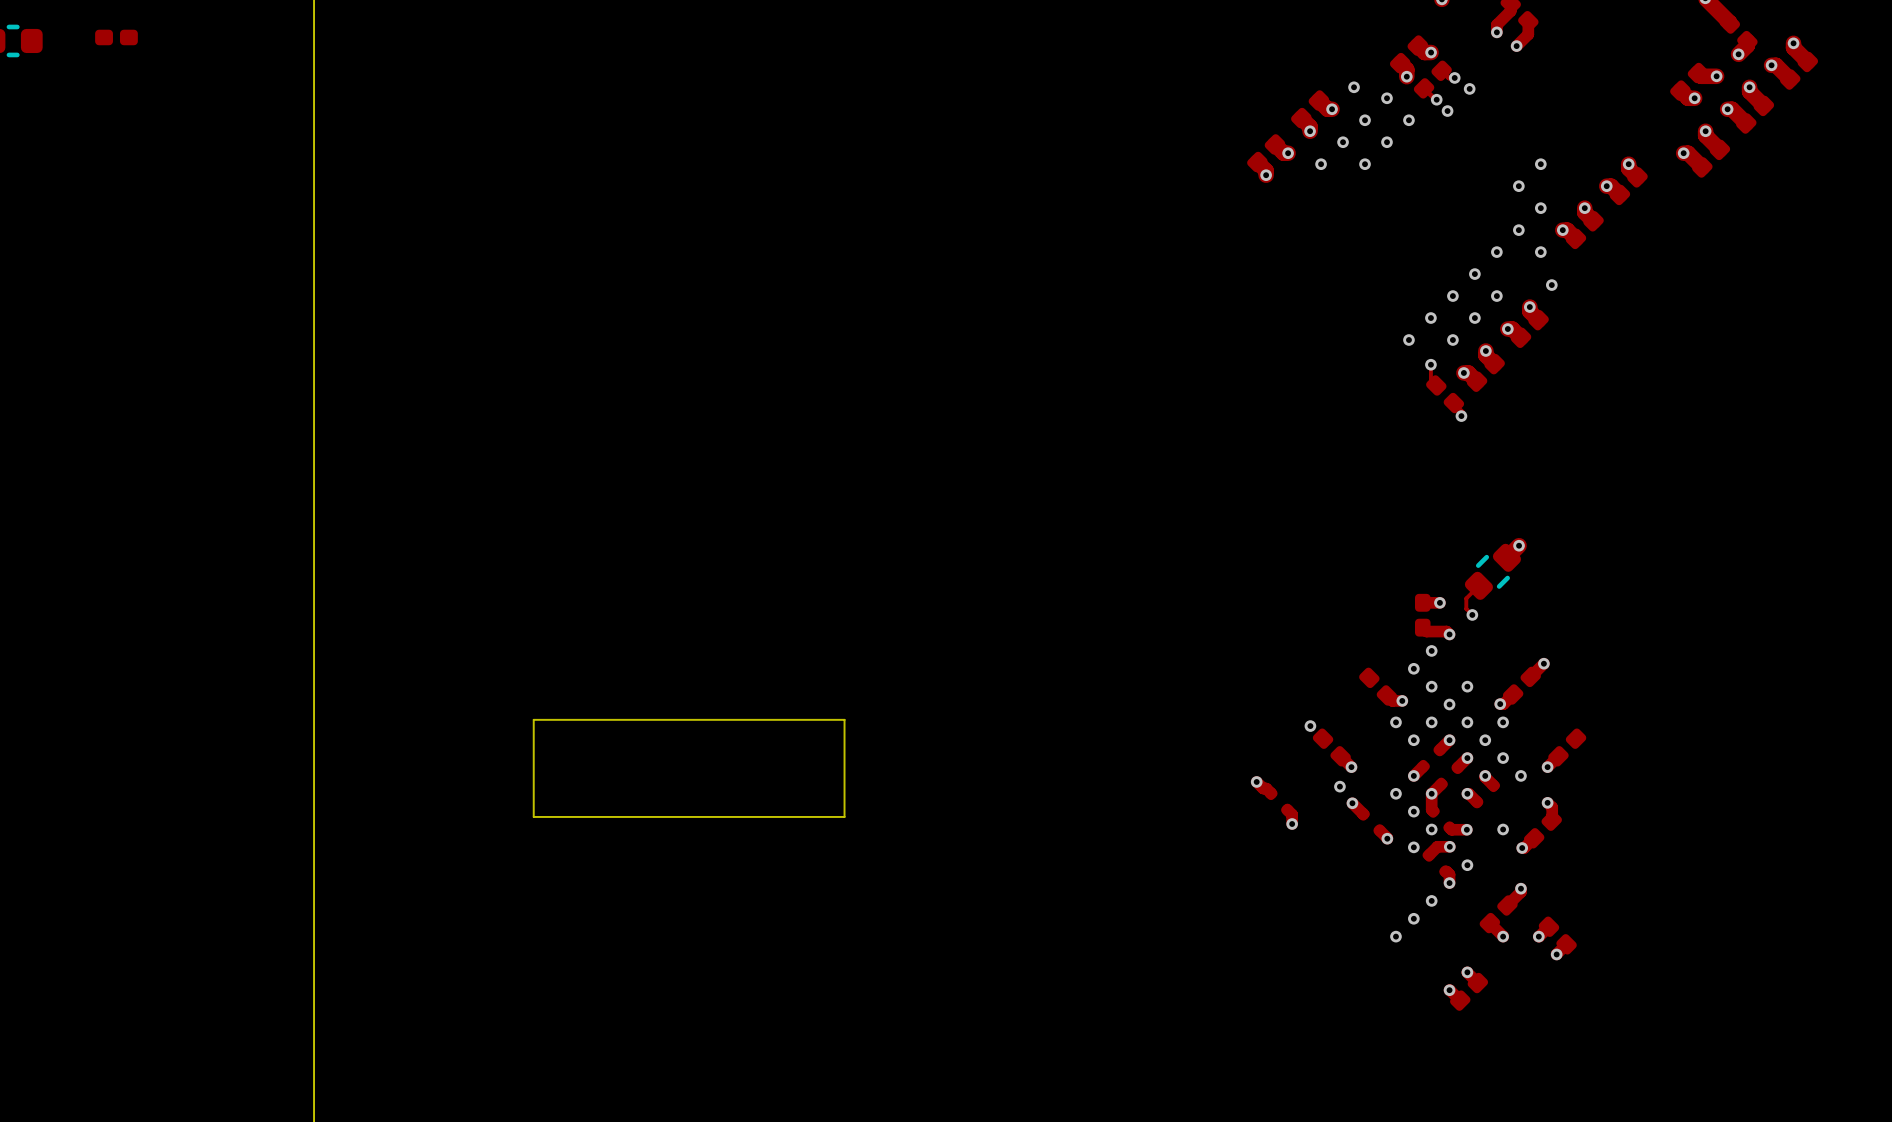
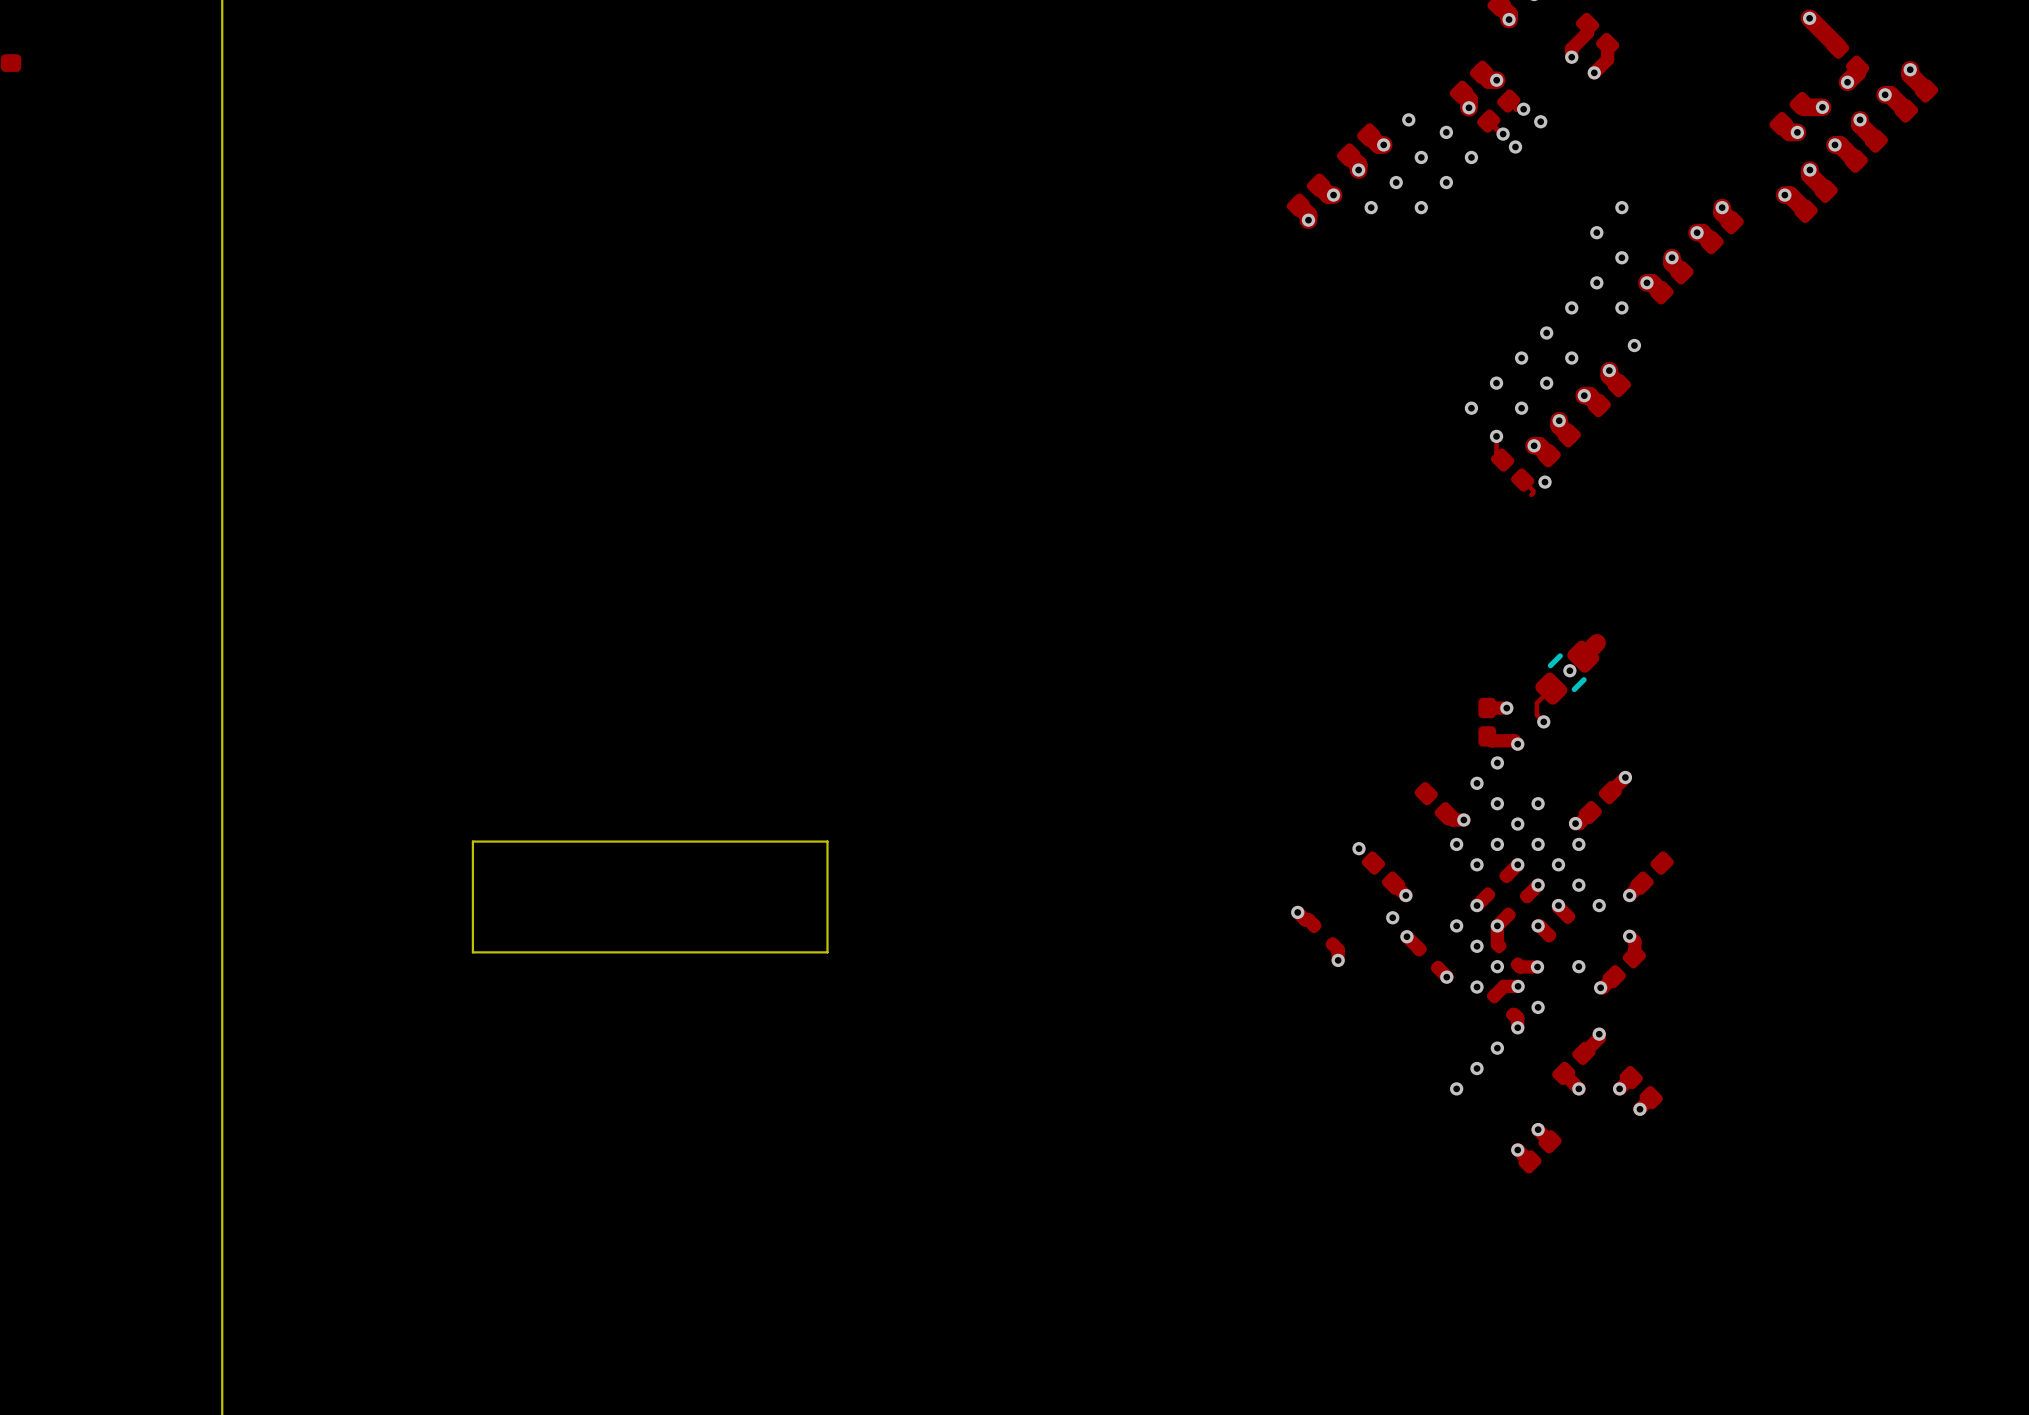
via position: (1461, 416) -> (1545, 482)
via position: (1519, 545) -> (1569, 670)

